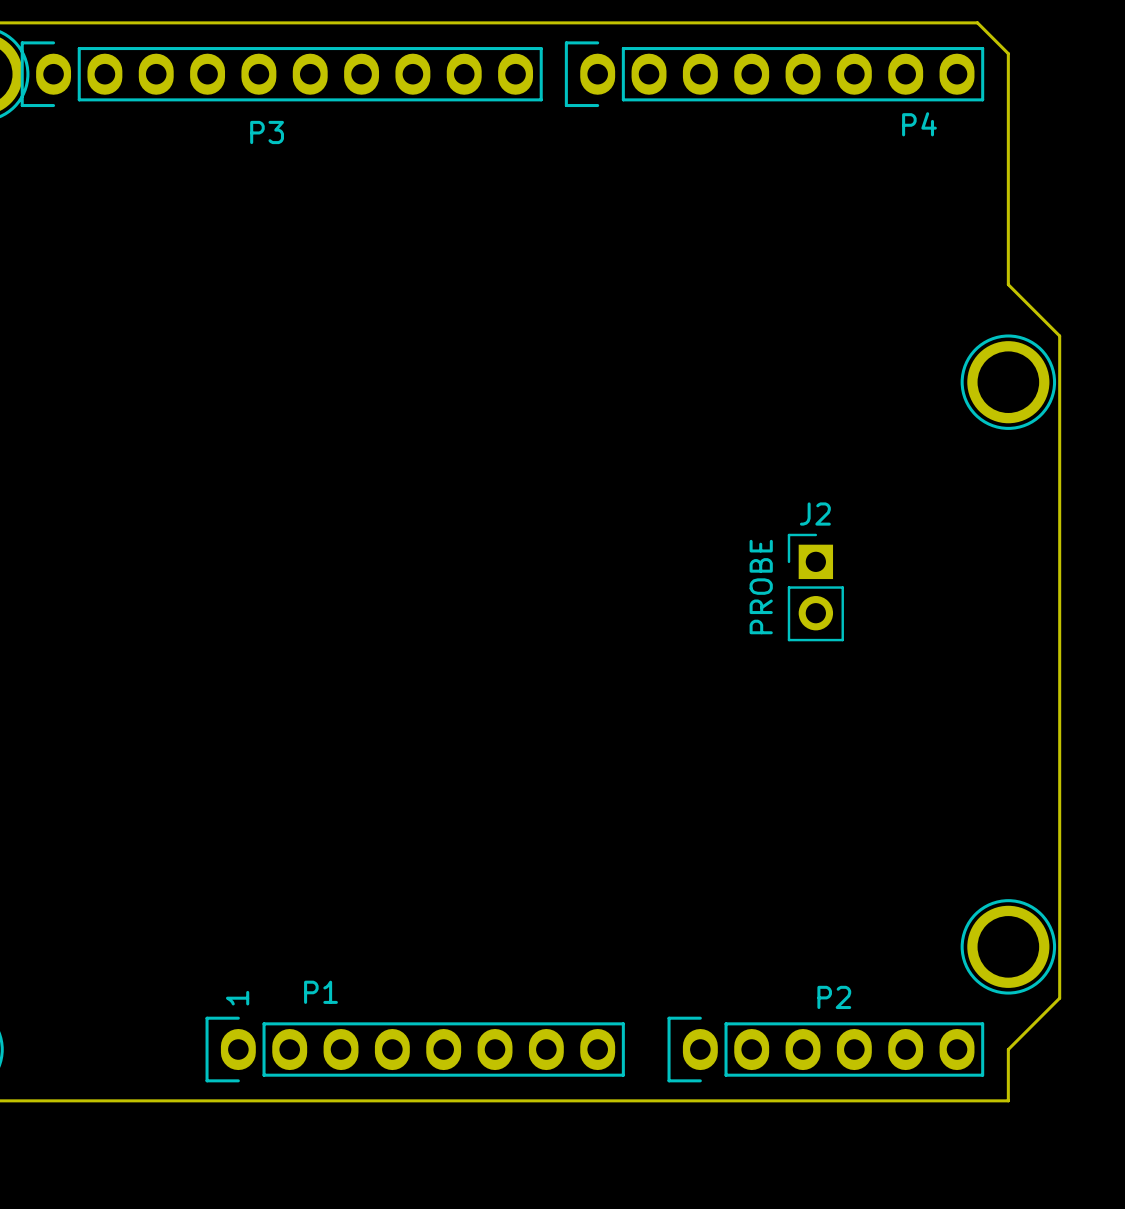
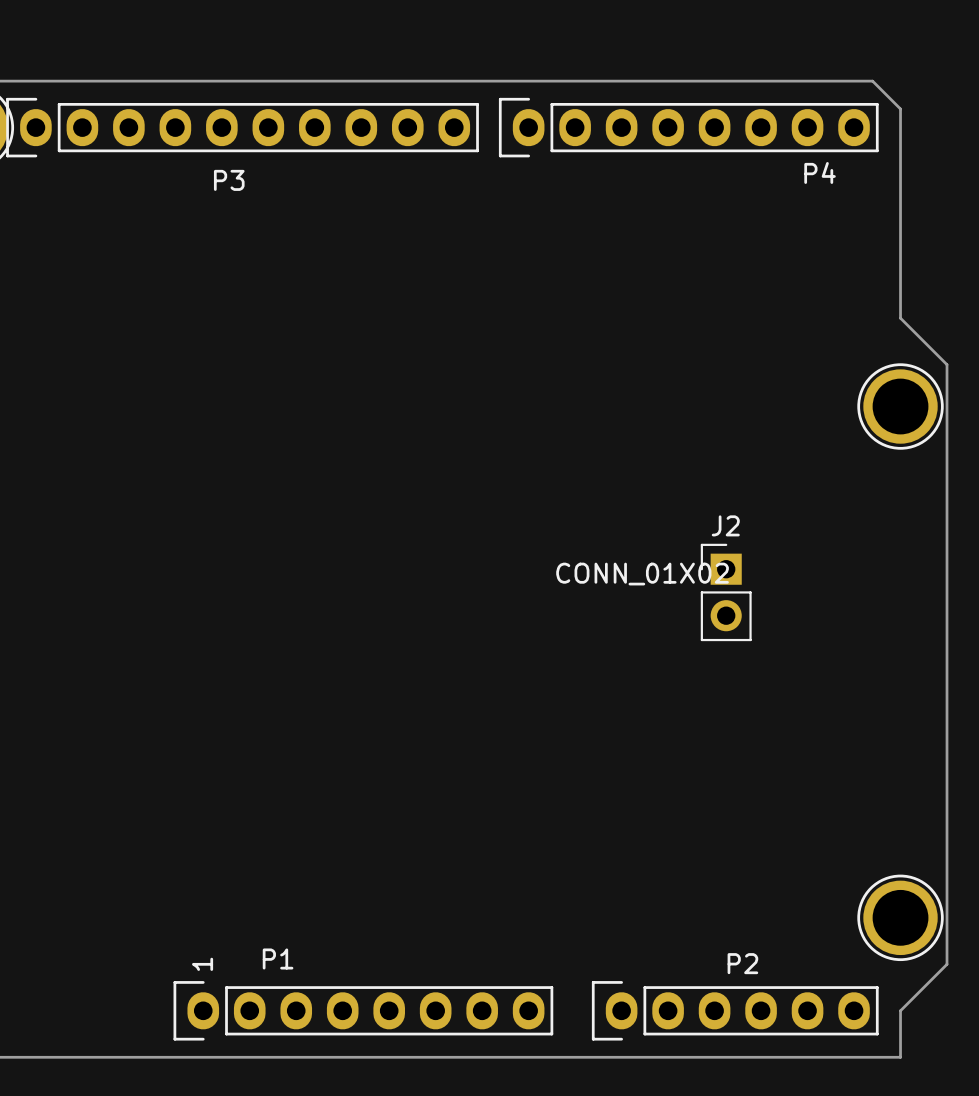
J2 value: PROBE (761, 587) -> CONN_01X02 (642, 574)

